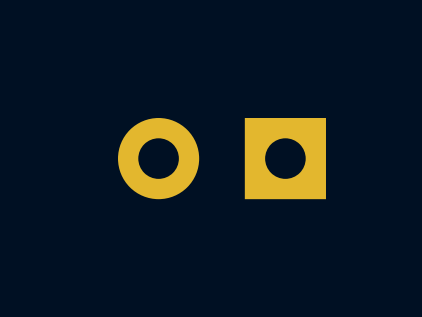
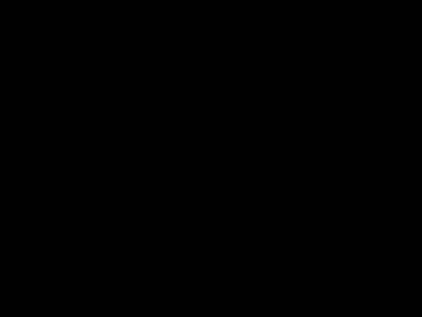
part: (221, 158) -> none

